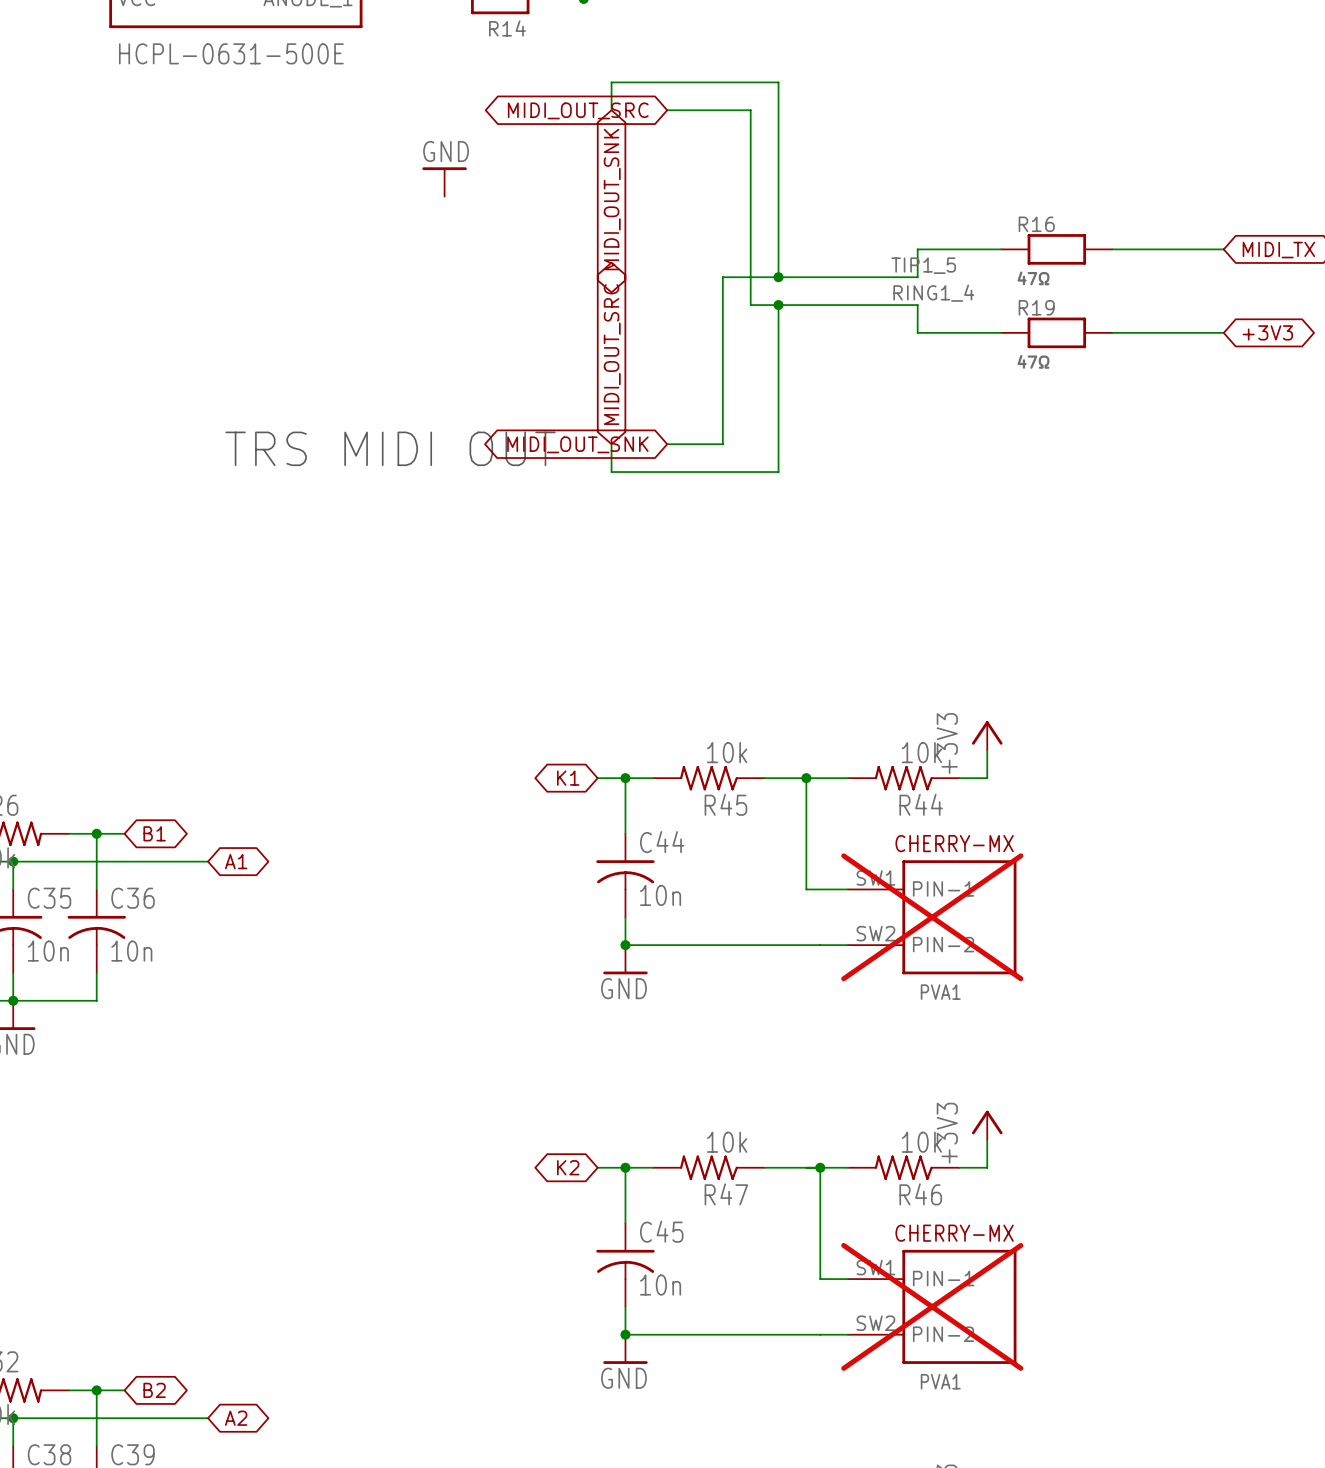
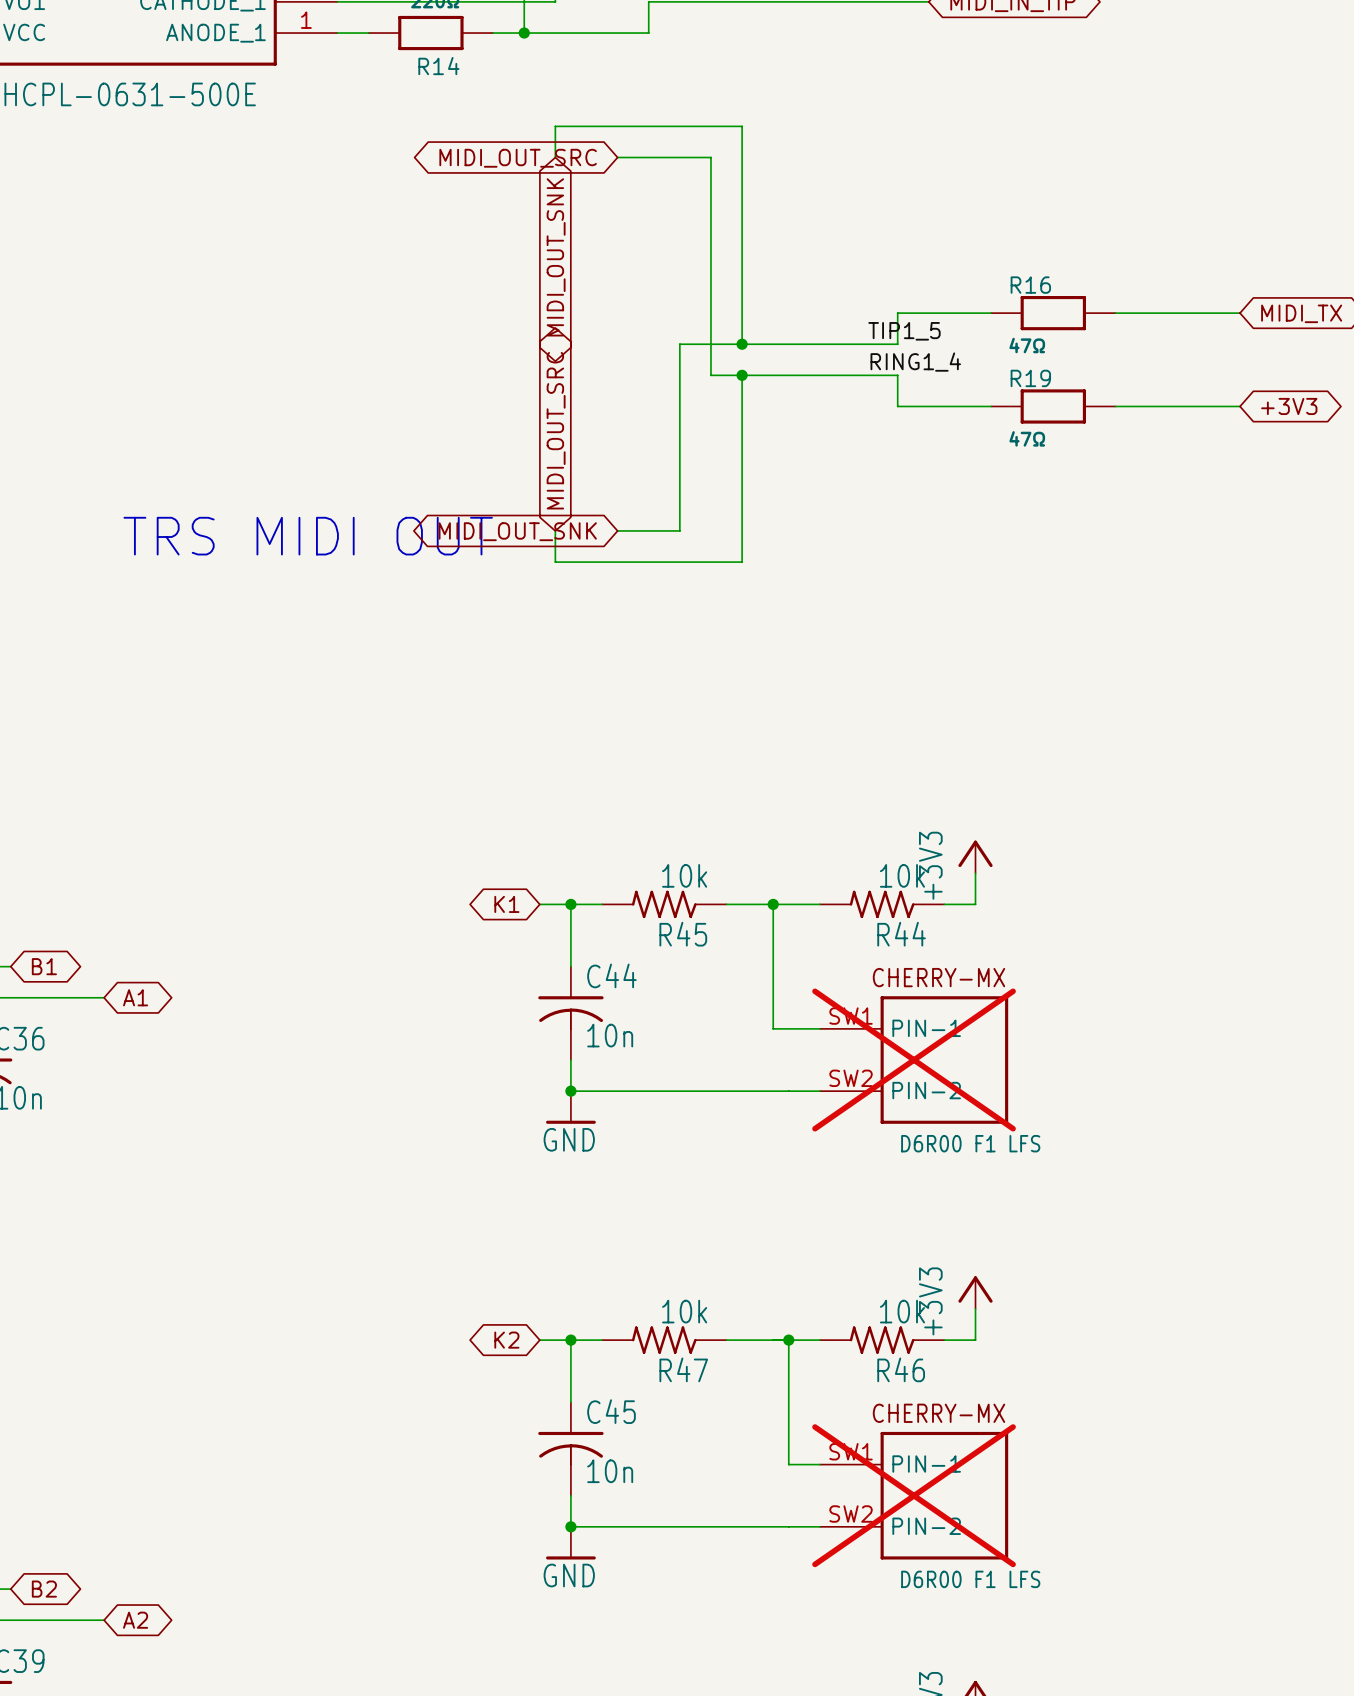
power symbol: GND (444, 181) -> none
part value: PVA1 (940, 992) -> D6R00 F1 LFS (970, 1143)
part value: PVA1 (940, 1381) -> D6R00 F1 LFS (970, 1579)

